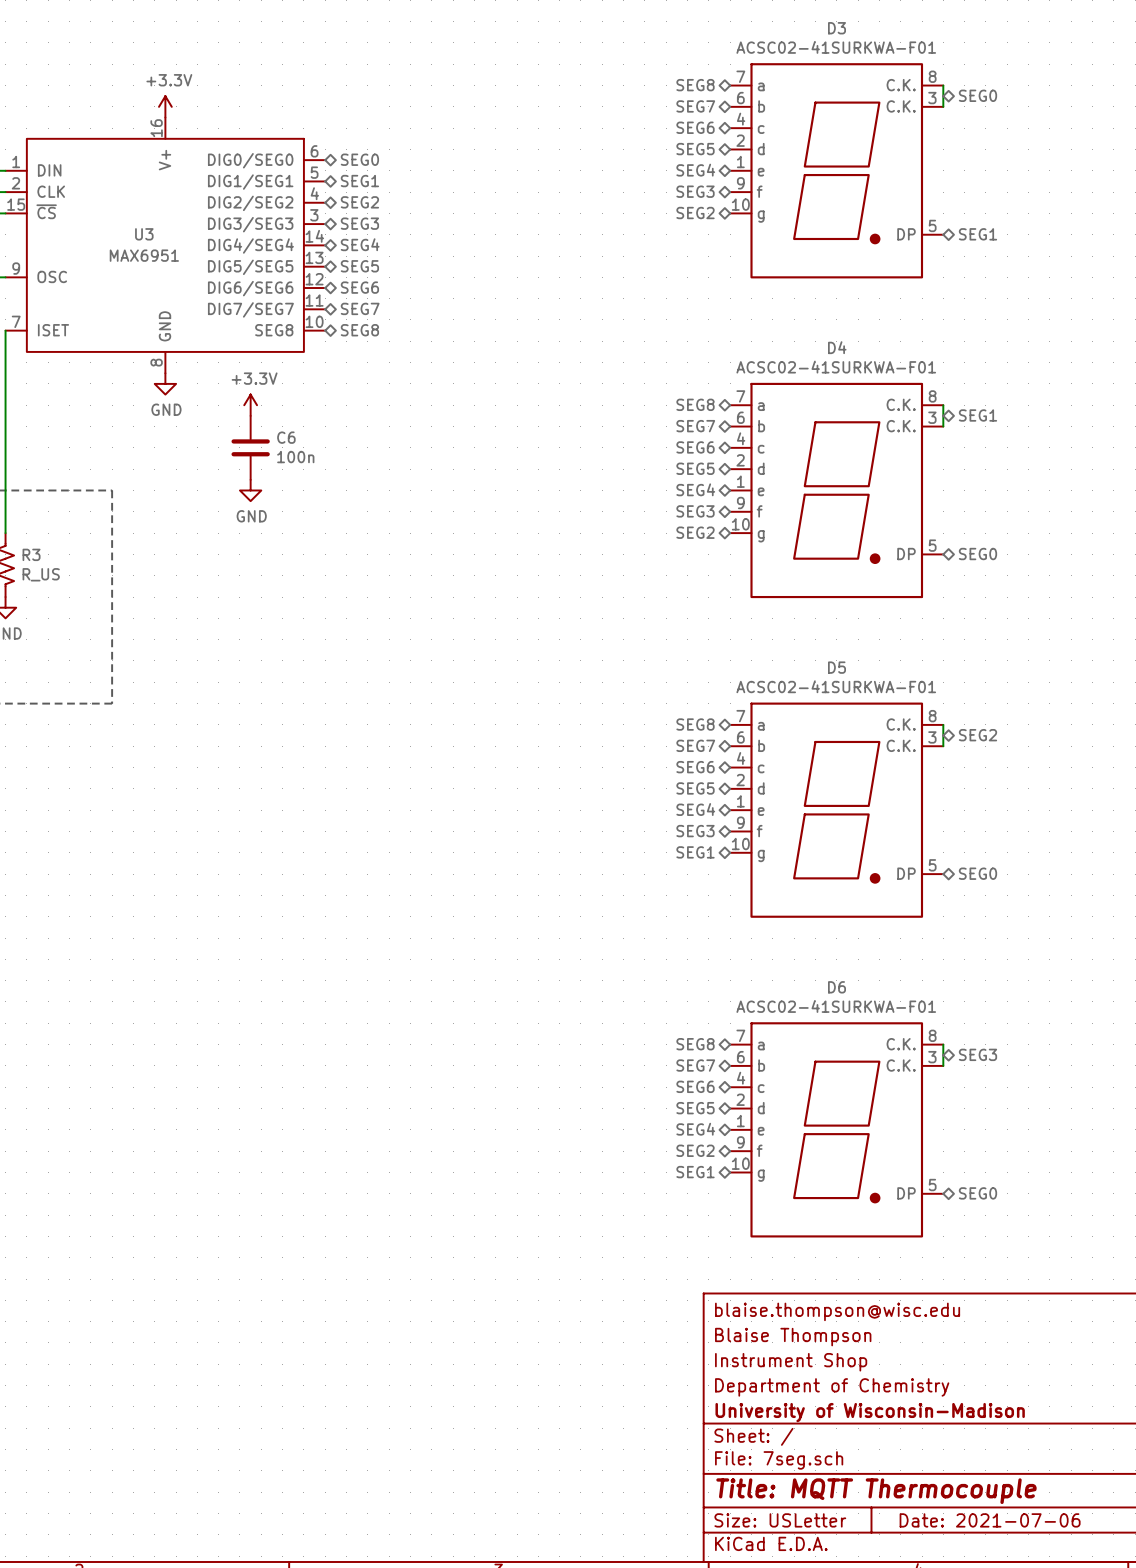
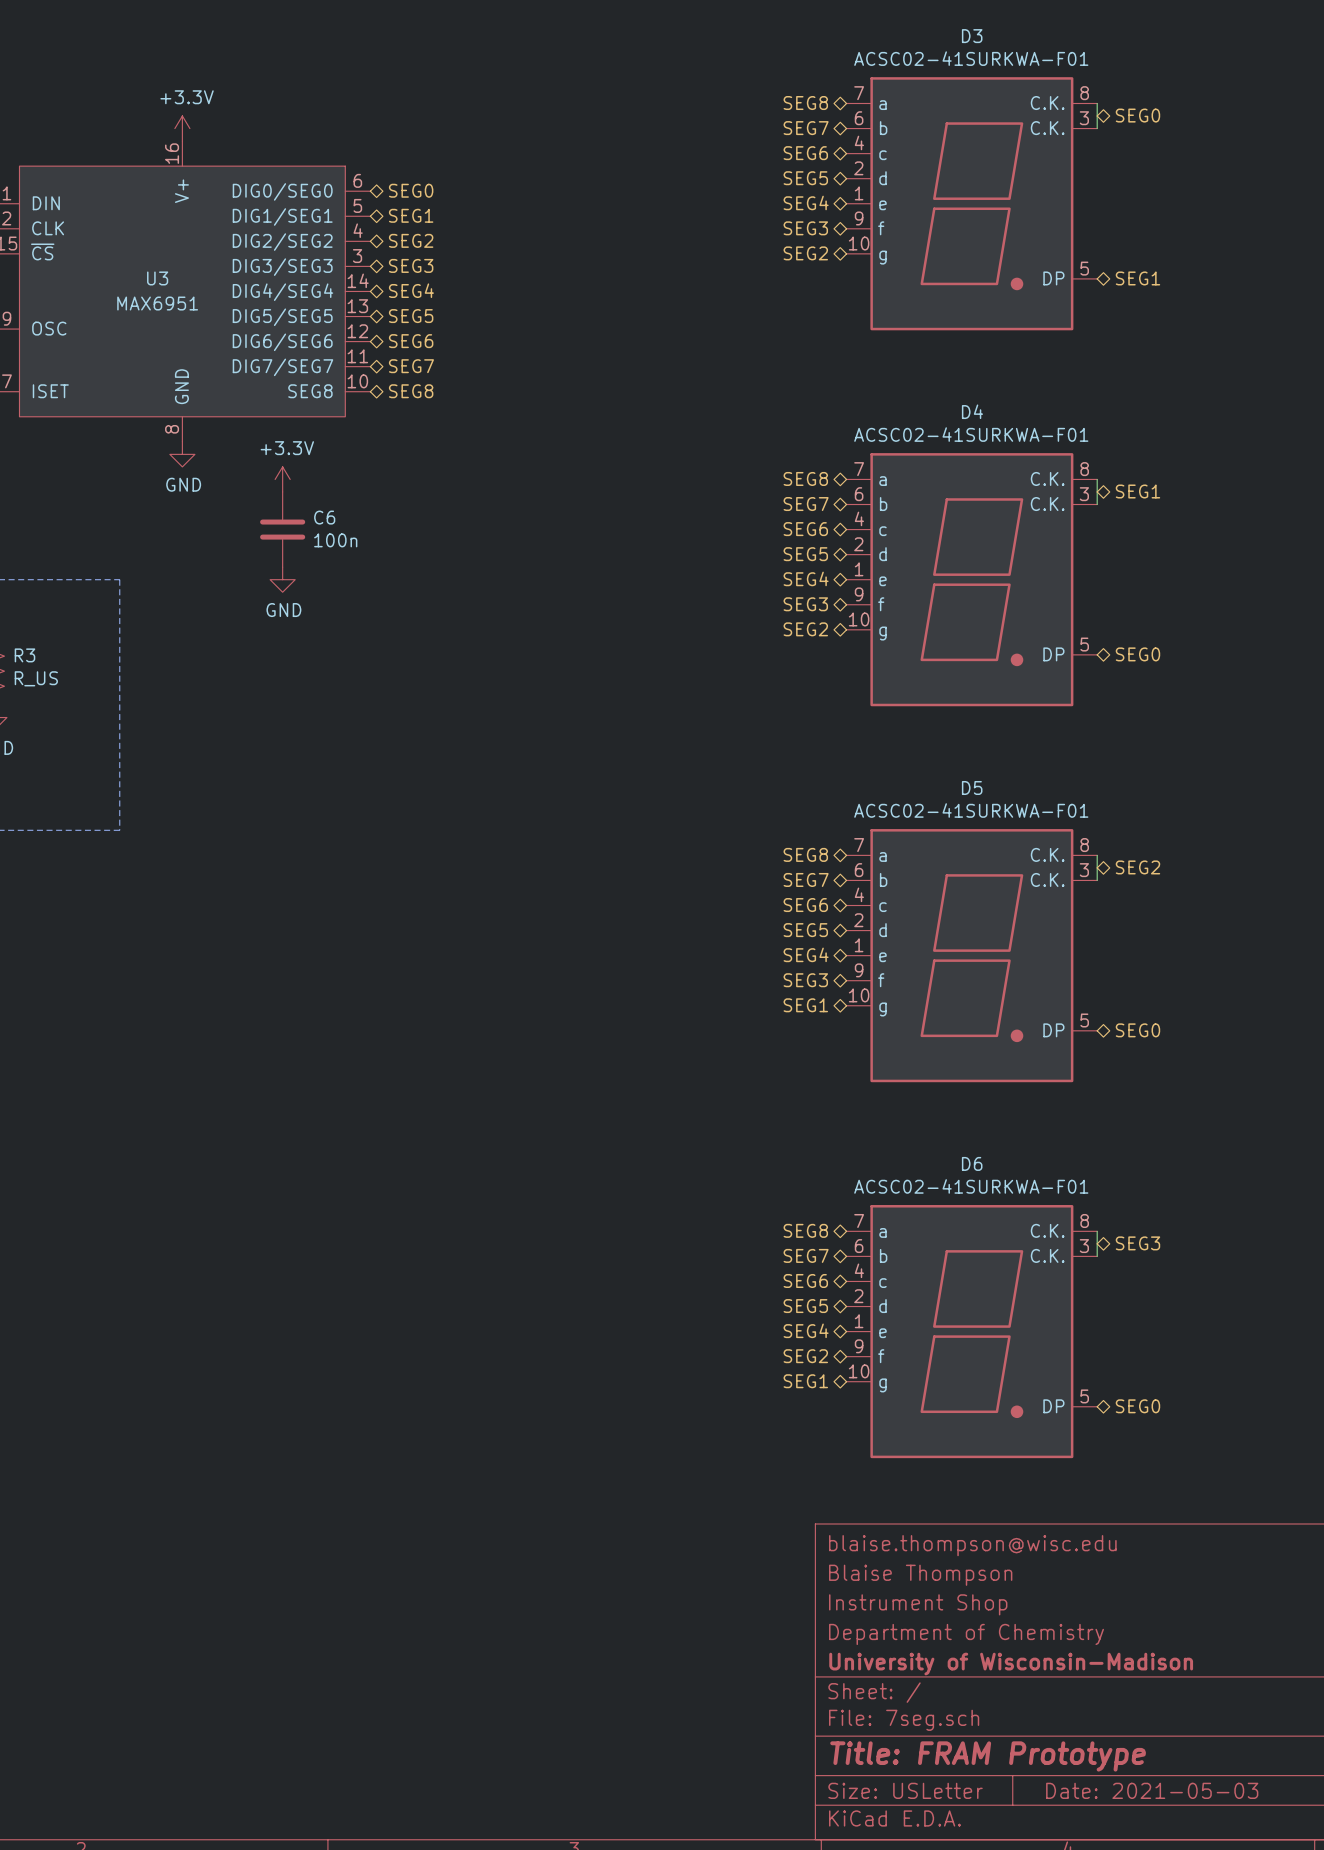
title block: Title: MQTT Thermocouple (876, 1491) -> Title: FRAM Prototype (988, 1756)
title block: Date: 2021-07-06 (990, 1520) -> Date: 2021-05-03 (1152, 1790)

